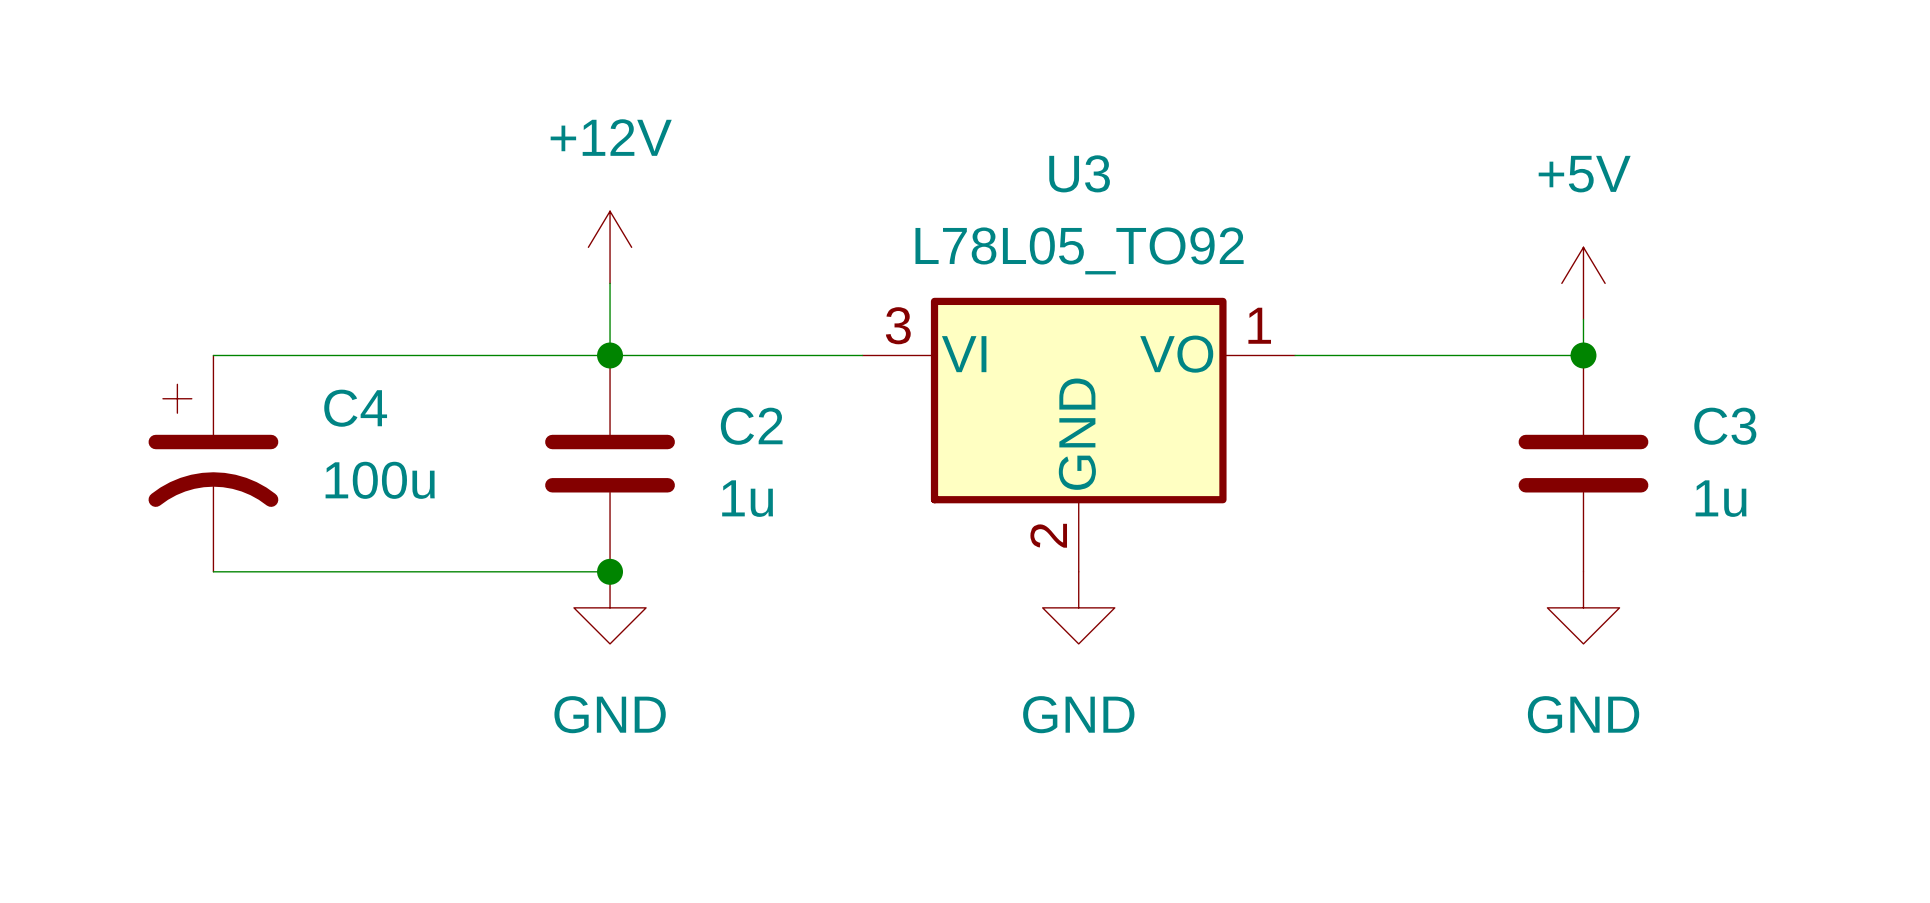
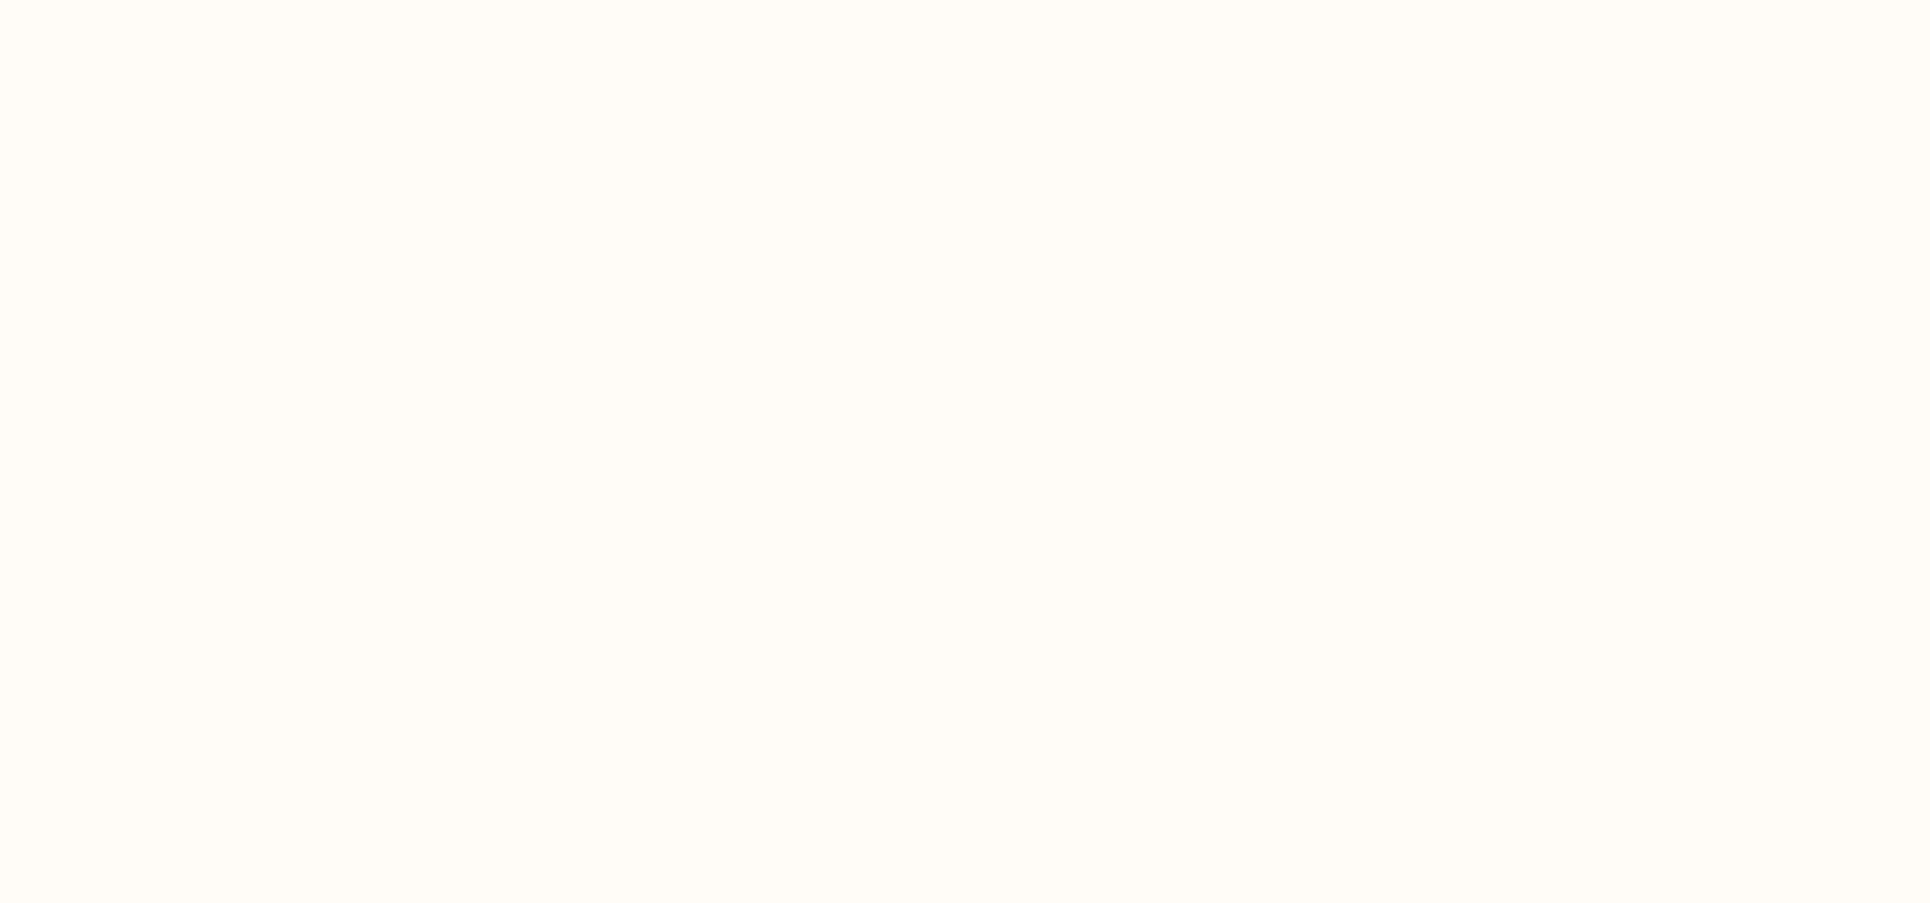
power symbol: +12V (610, 247) -> none
wire: (610, 283) (610, 355) -> none
power symbol: +5V (1583, 283) -> none
wire: (1583, 319) (1583, 355) (1295, 355) -> none
wire: (213, 355) (862, 355) -> none
junction: (610, 355) -> none
junction: (1583, 355) -> none
U3: L78L05_TO92 (1078, 434) -> none
C4: 100u (213, 463) -> none
C2: 1u (610, 463) -> none
C3: 1u (1583, 463) -> none
wire: (213, 571) (610, 571) -> none
junction: (610, 571) -> none
power symbol: GND (610, 607) -> none
power symbol: GND (1078, 607) -> none
power symbol: GND (1583, 607) -> none

